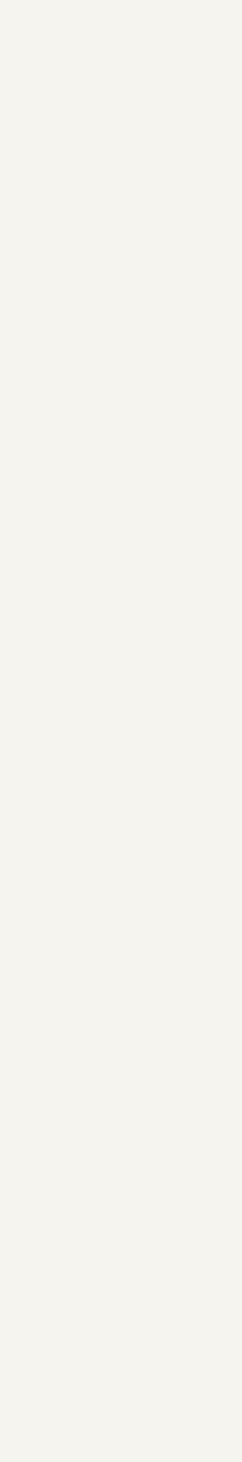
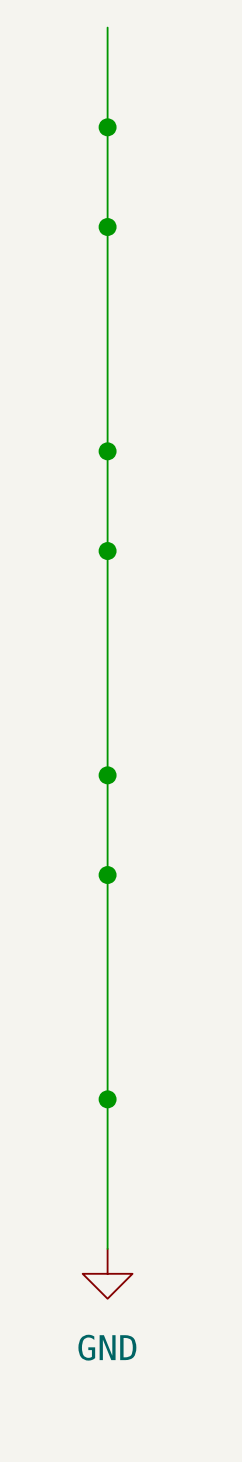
wire: none -> (107, 27) (107, 1248)
junction: none -> (107, 127)
junction: none -> (107, 227)
junction: none -> (107, 451)
junction: none -> (107, 551)
junction: none -> (107, 775)
junction: none -> (107, 875)
junction: none -> (107, 1099)
power symbol: none -> GND (107, 1273)

